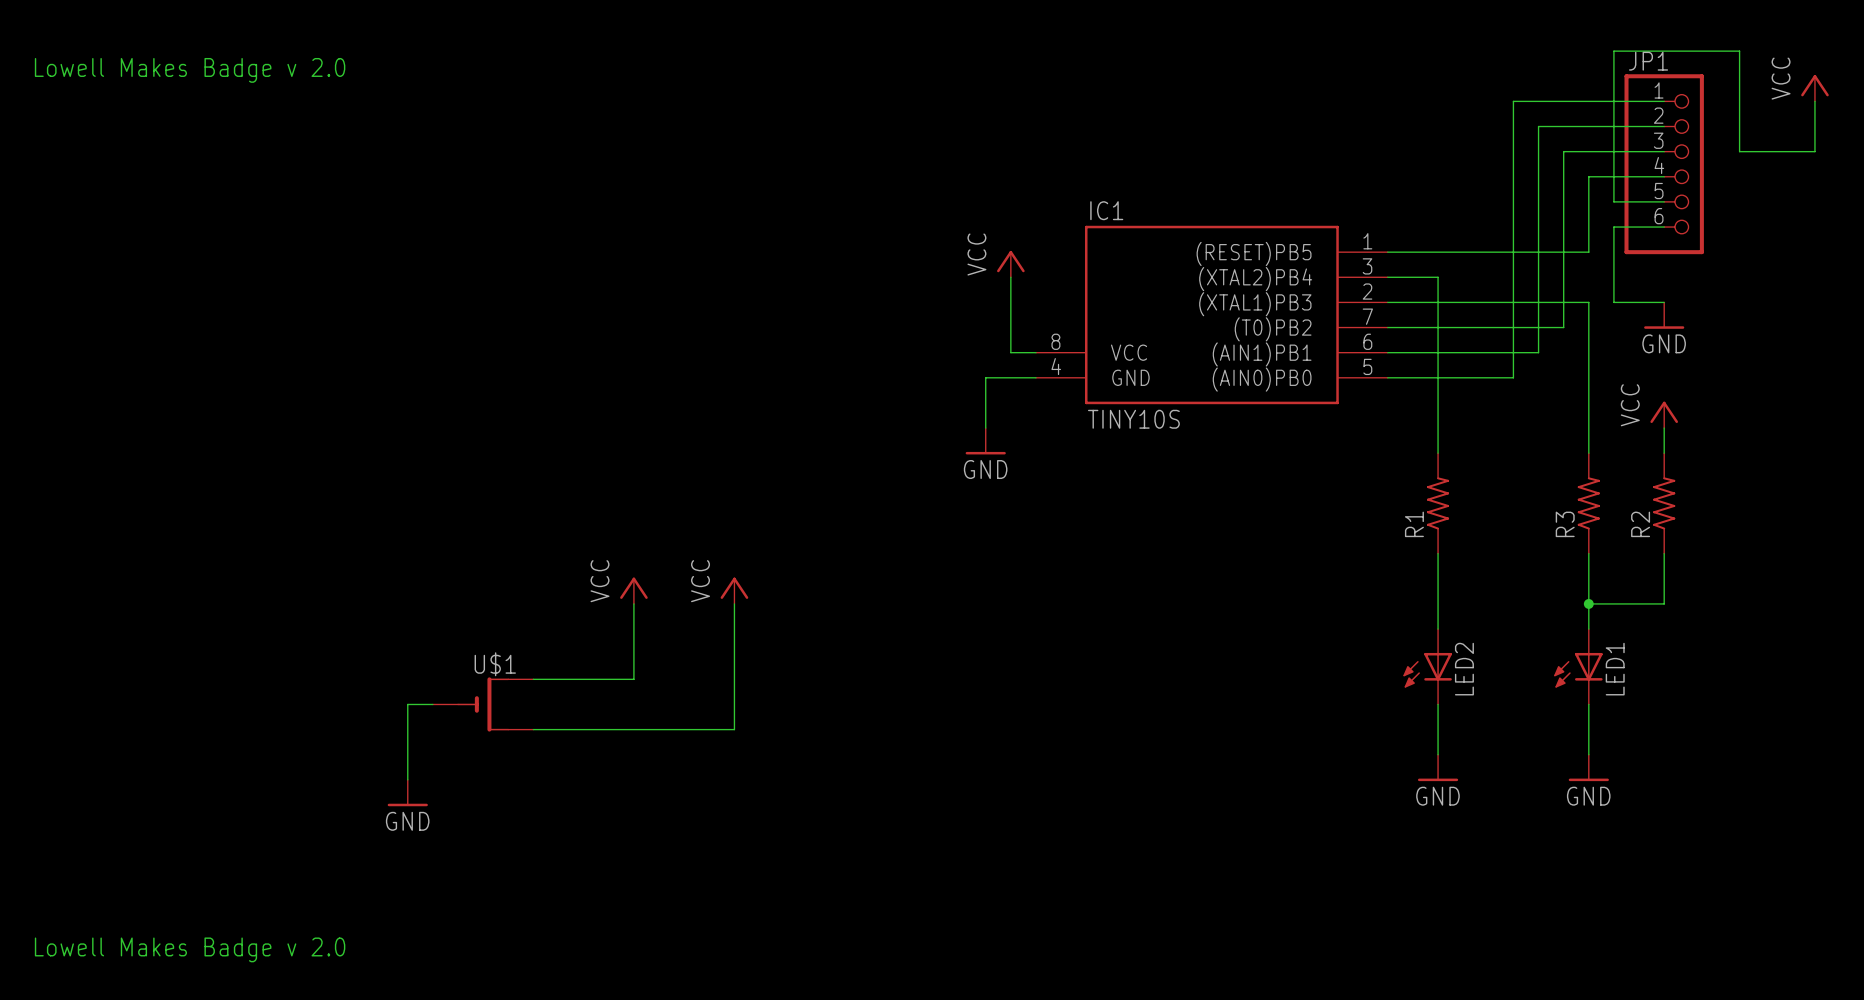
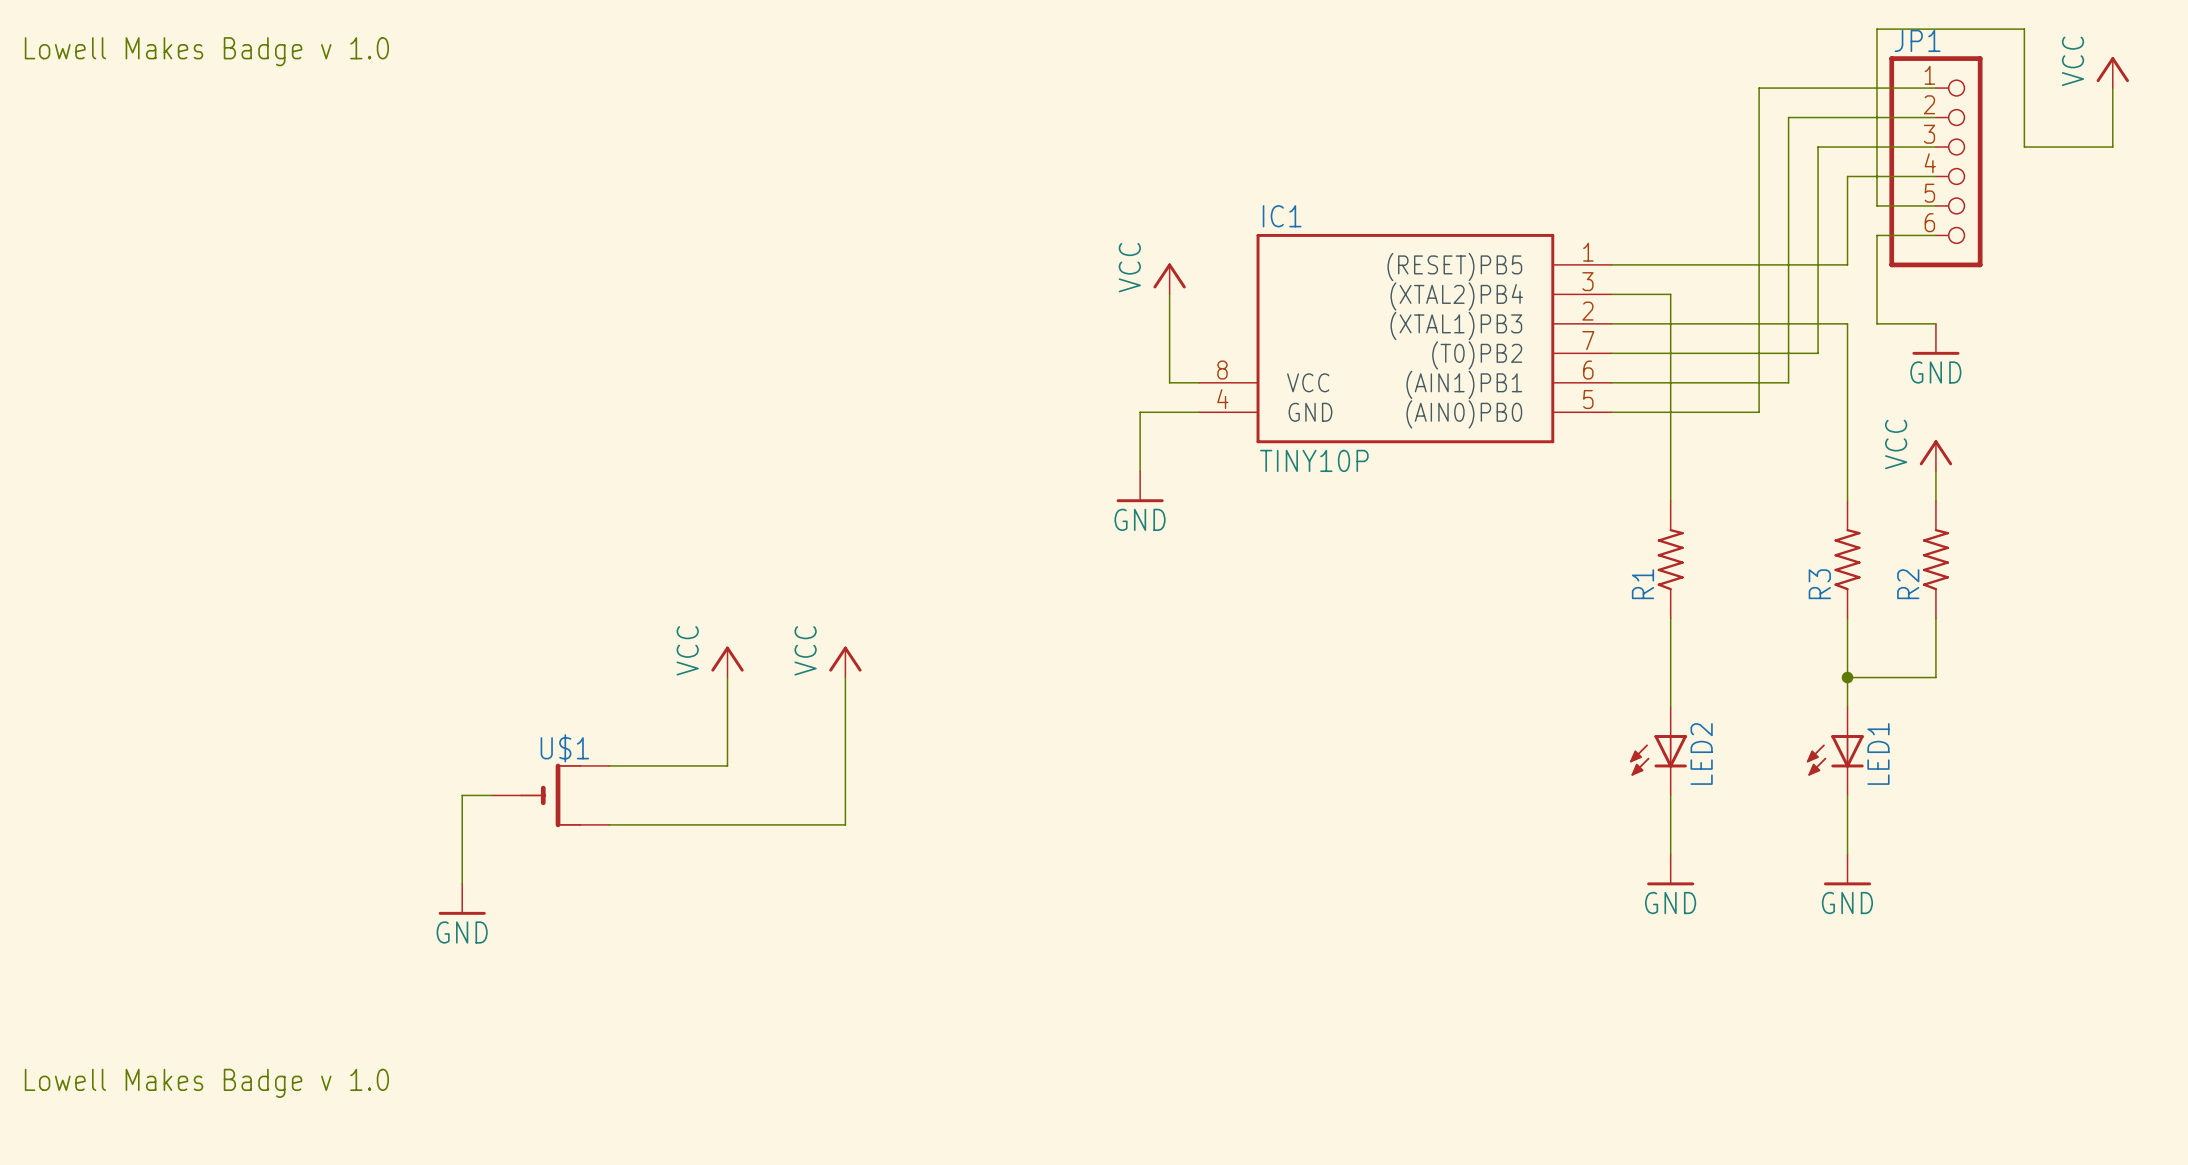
text: Lowell Makes Badge v 2.0 (190, 70) -> Lowell Makes Badge v 1.0 (206, 51)
IC1 value: TINY10S (1133, 419) -> TINY10P (1314, 460)
text: Lowell Makes Badge v 2.0 (190, 949) -> Lowell Makes Badge v 1.0 (206, 1083)

